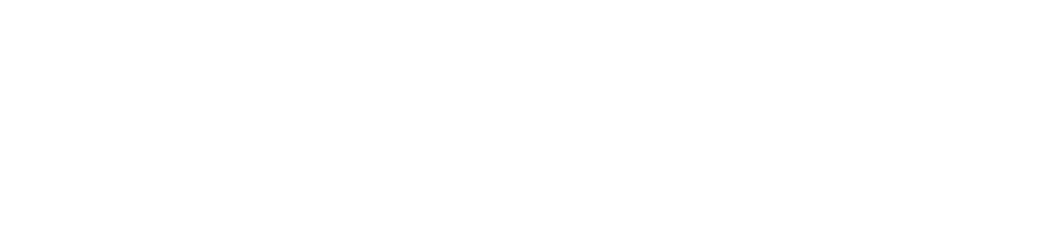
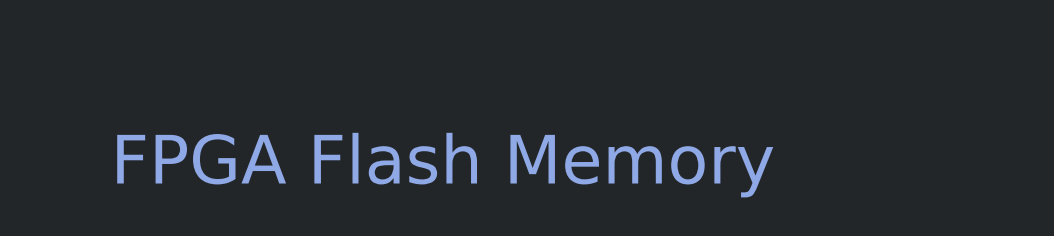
text: none -> FPGA Flash Memory (445, 165)

